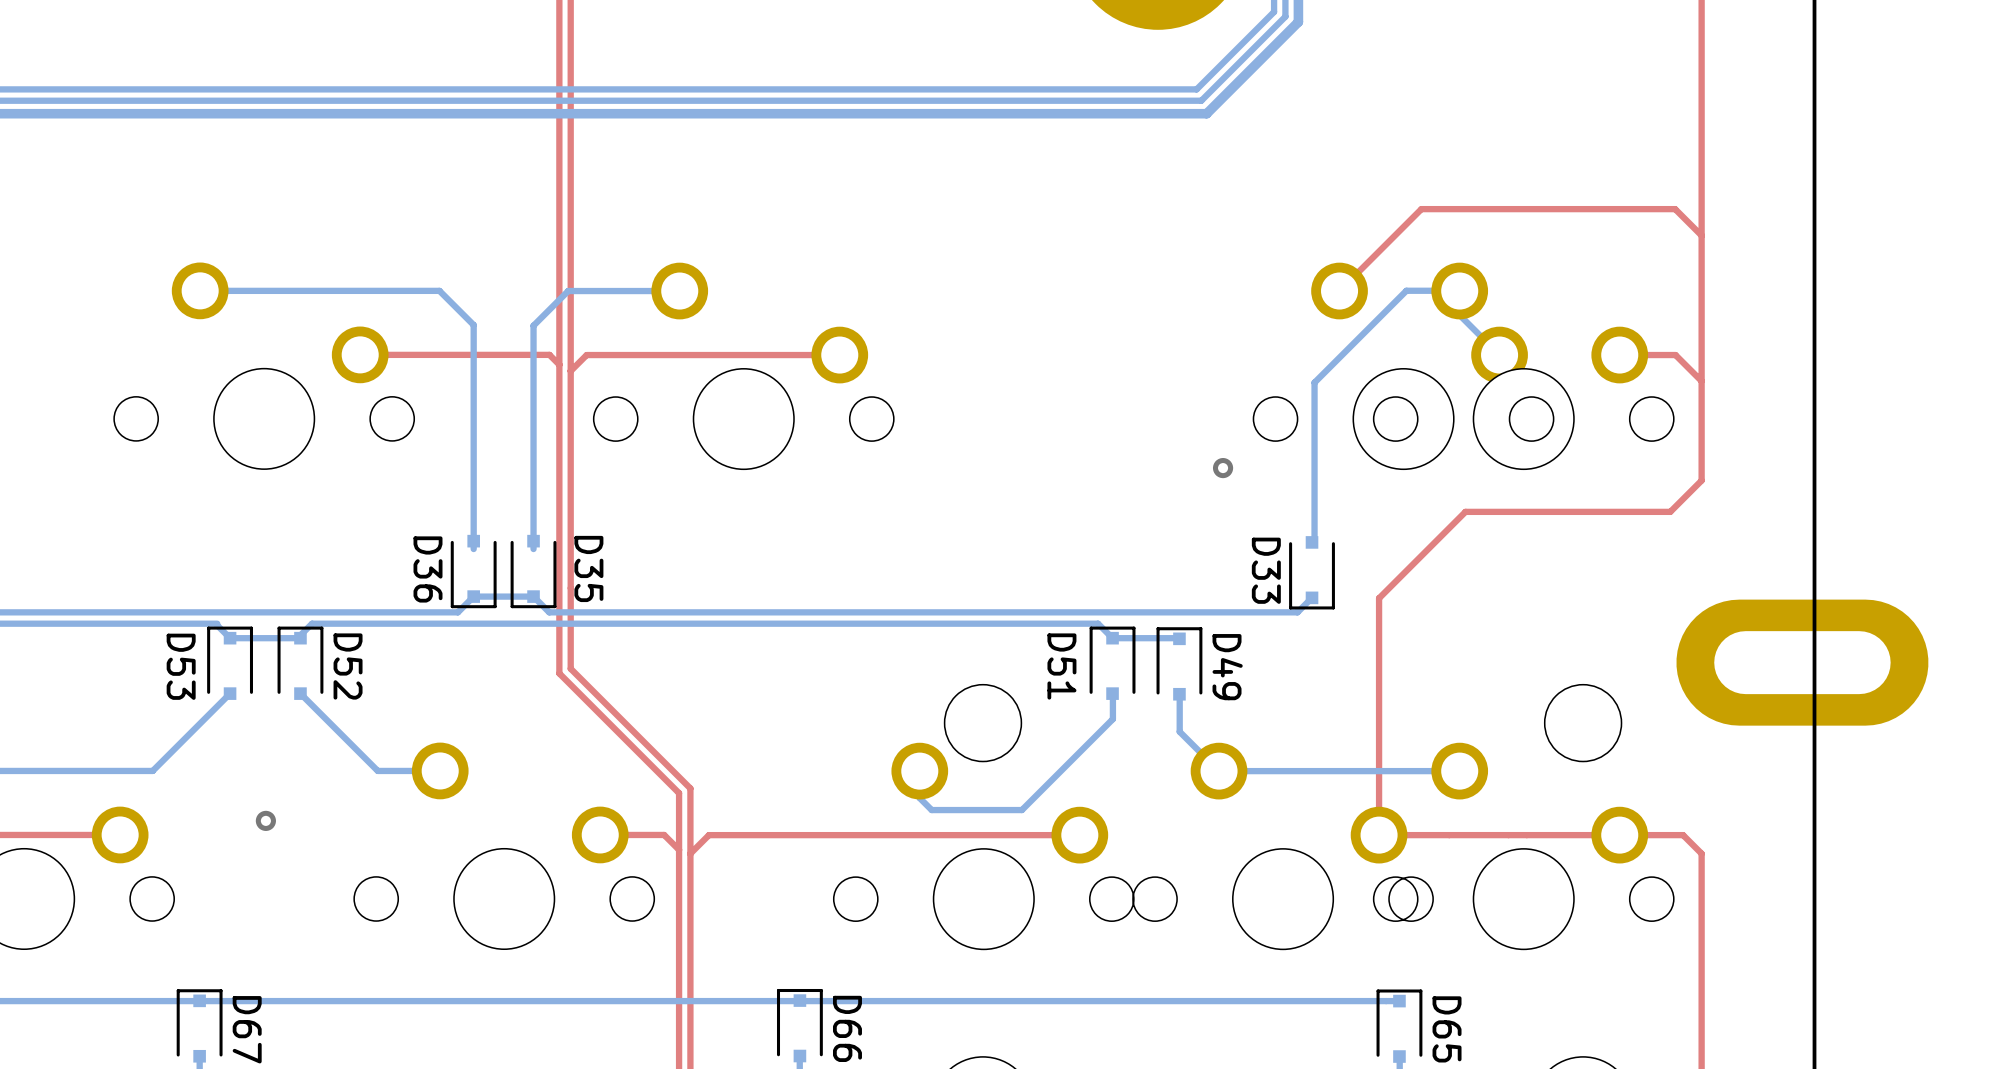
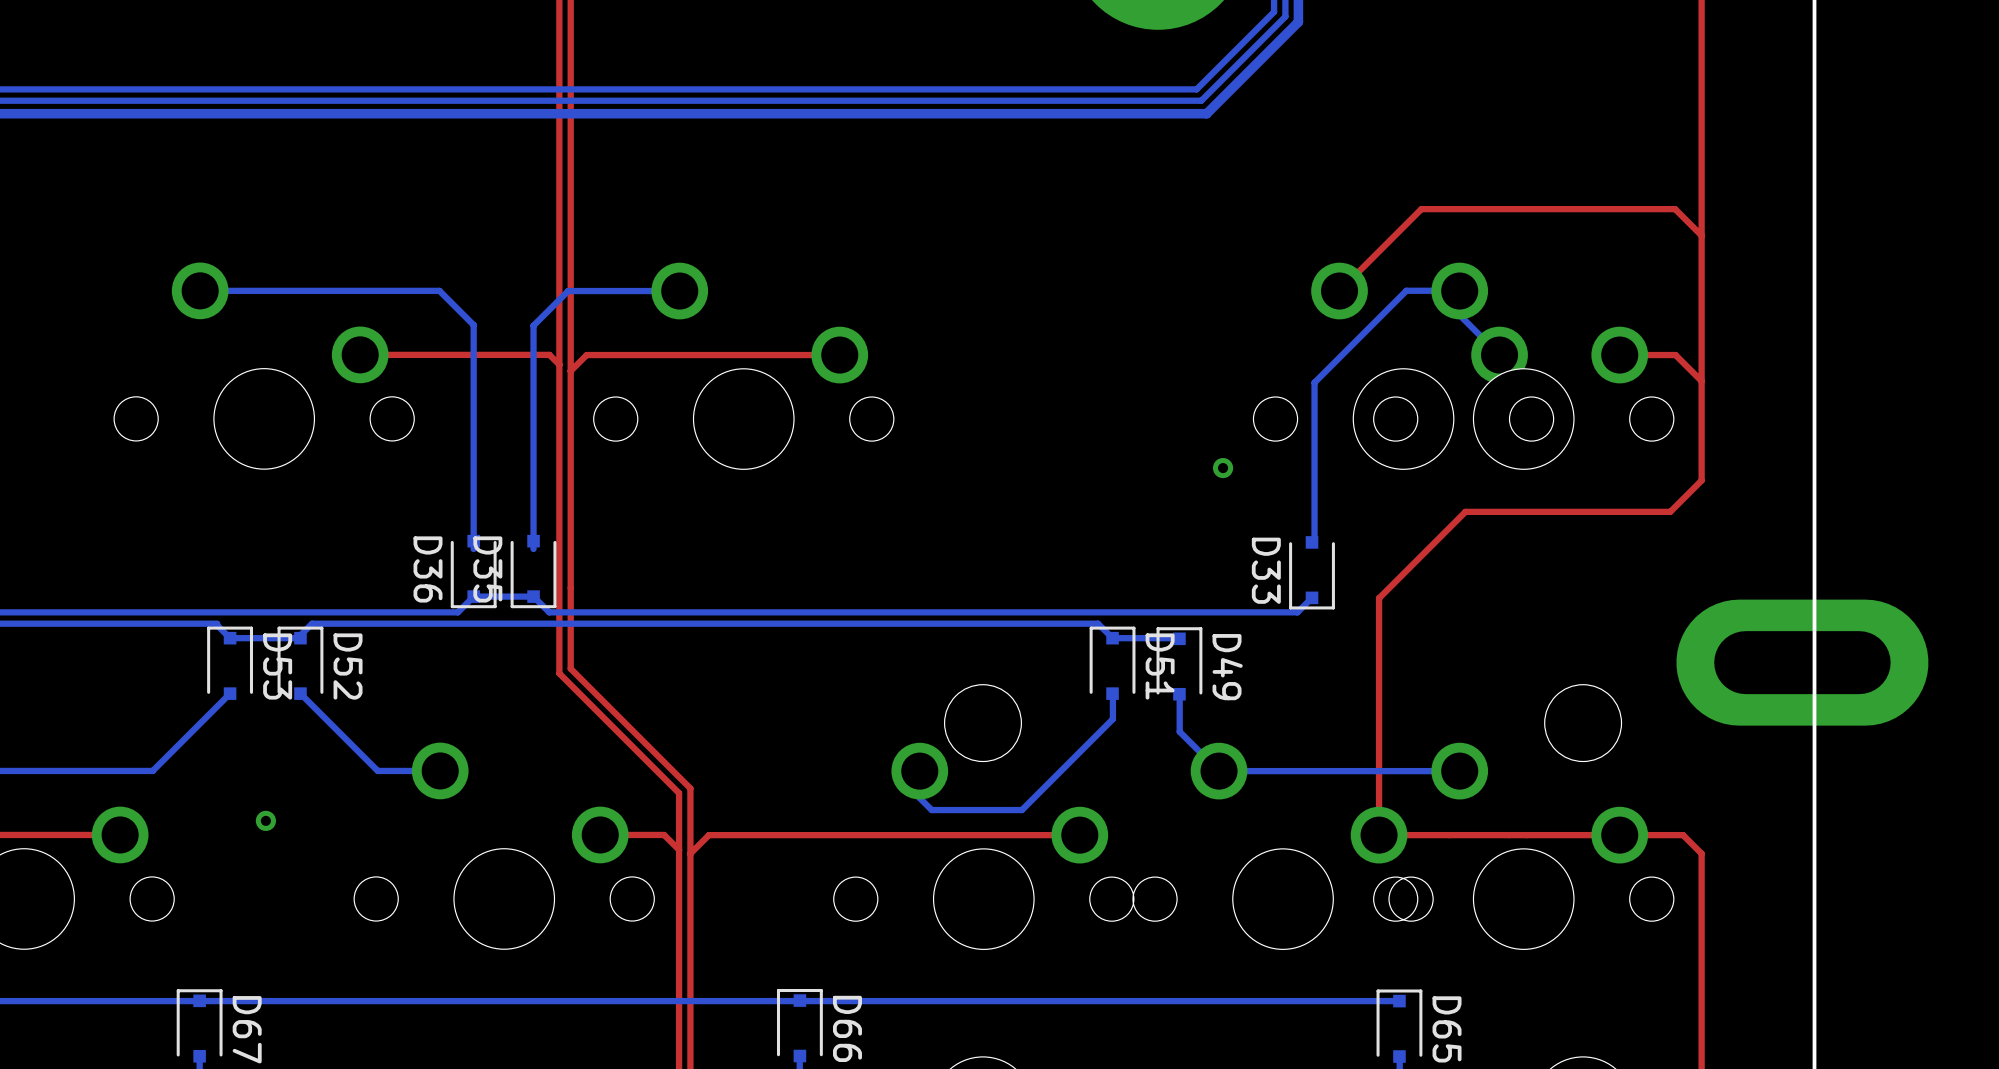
D35 name position: D35 (588, 568) -> D35 (487, 569)
D53 name position: D53 (181, 666) -> D53 (277, 666)
D51 name position: D51 (1061, 666) -> D51 (1160, 666)

